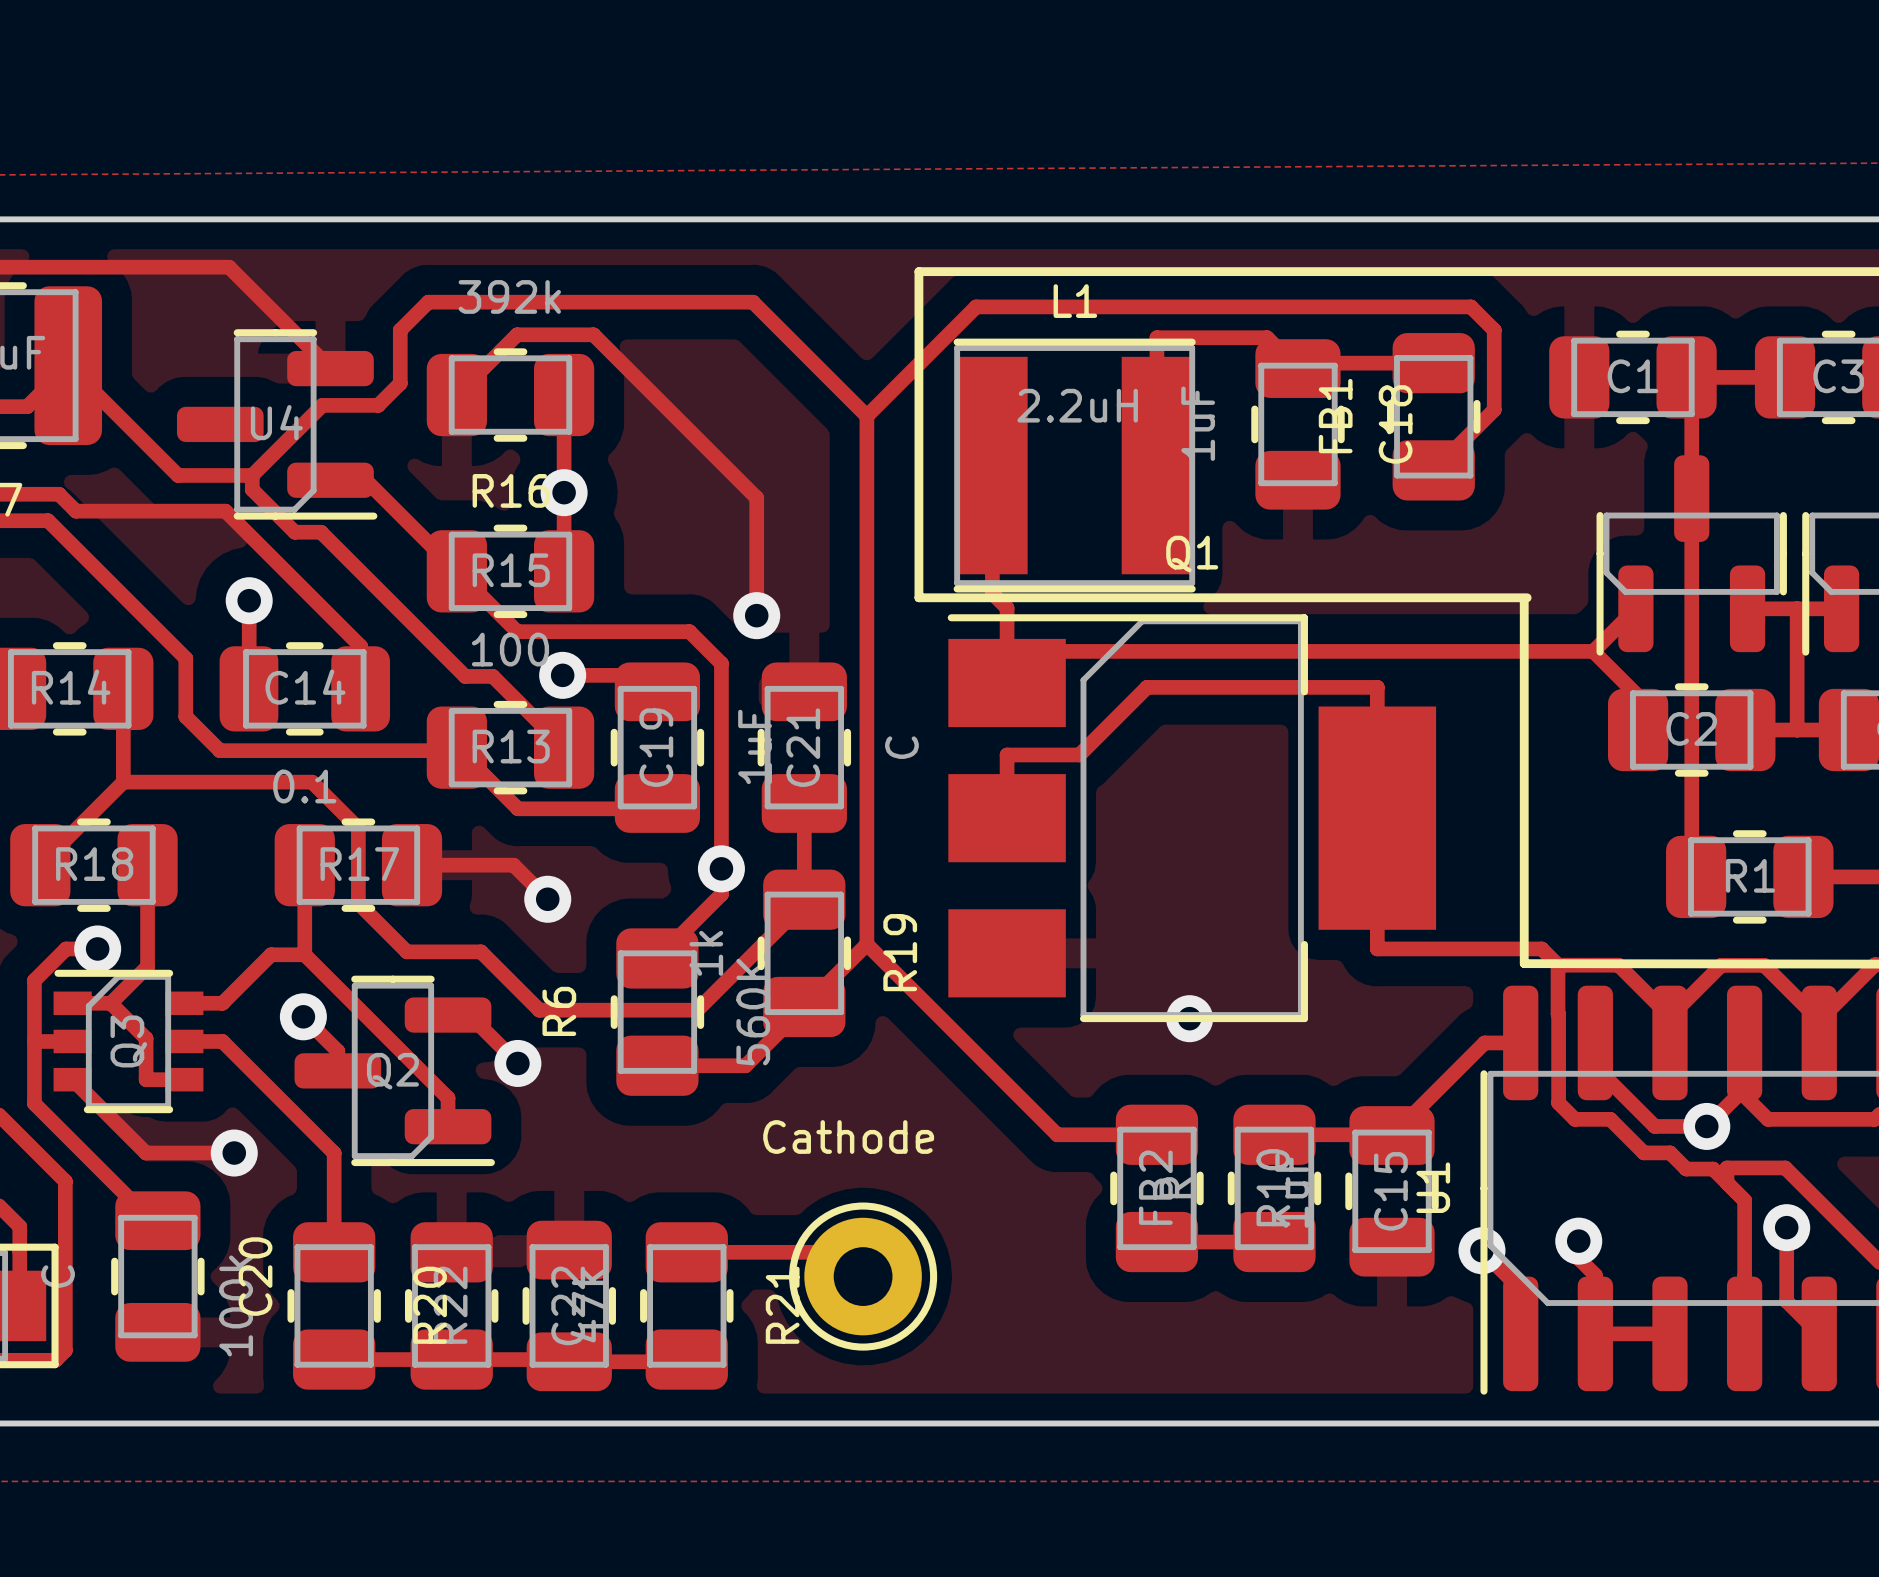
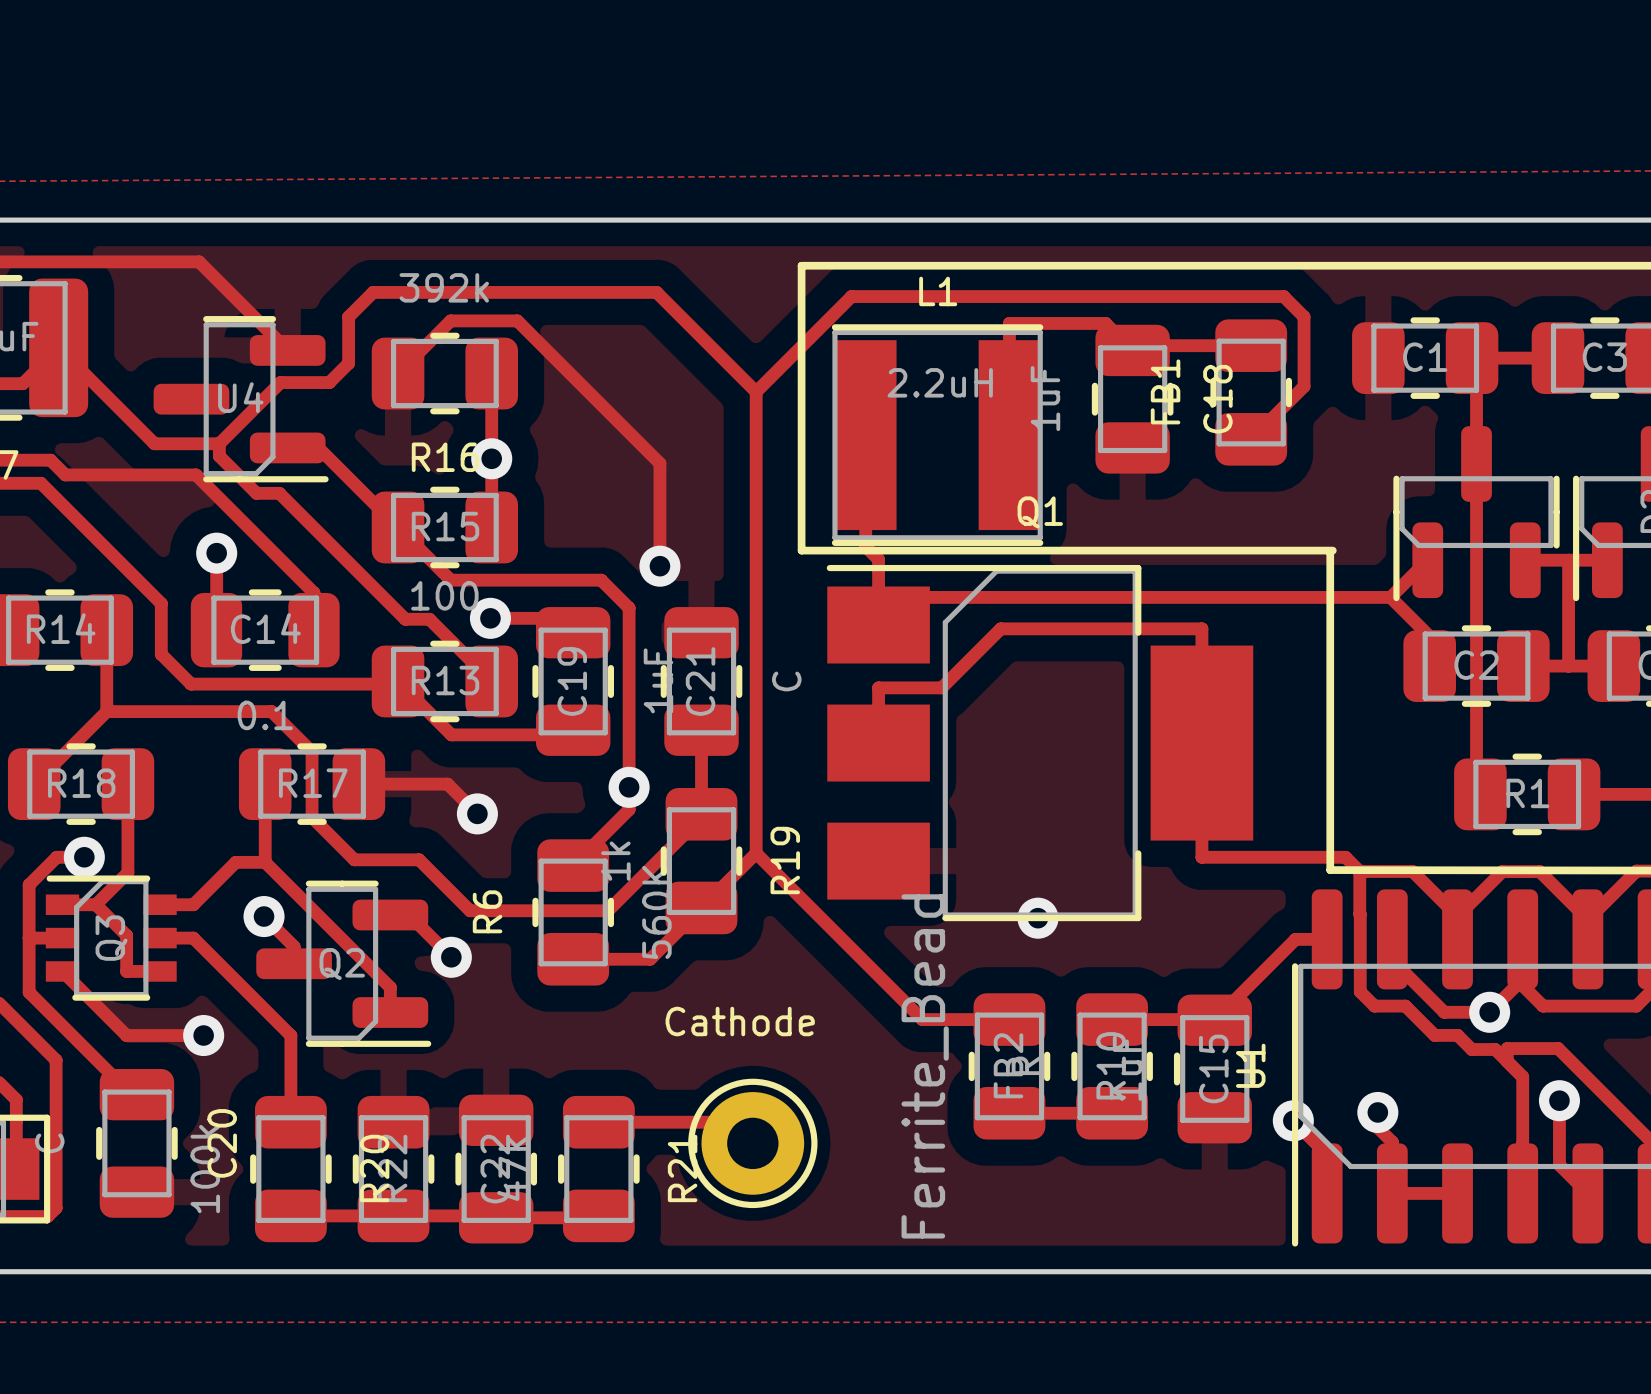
FB2 value: none -> Ferrite_Bead (925, 1066)

